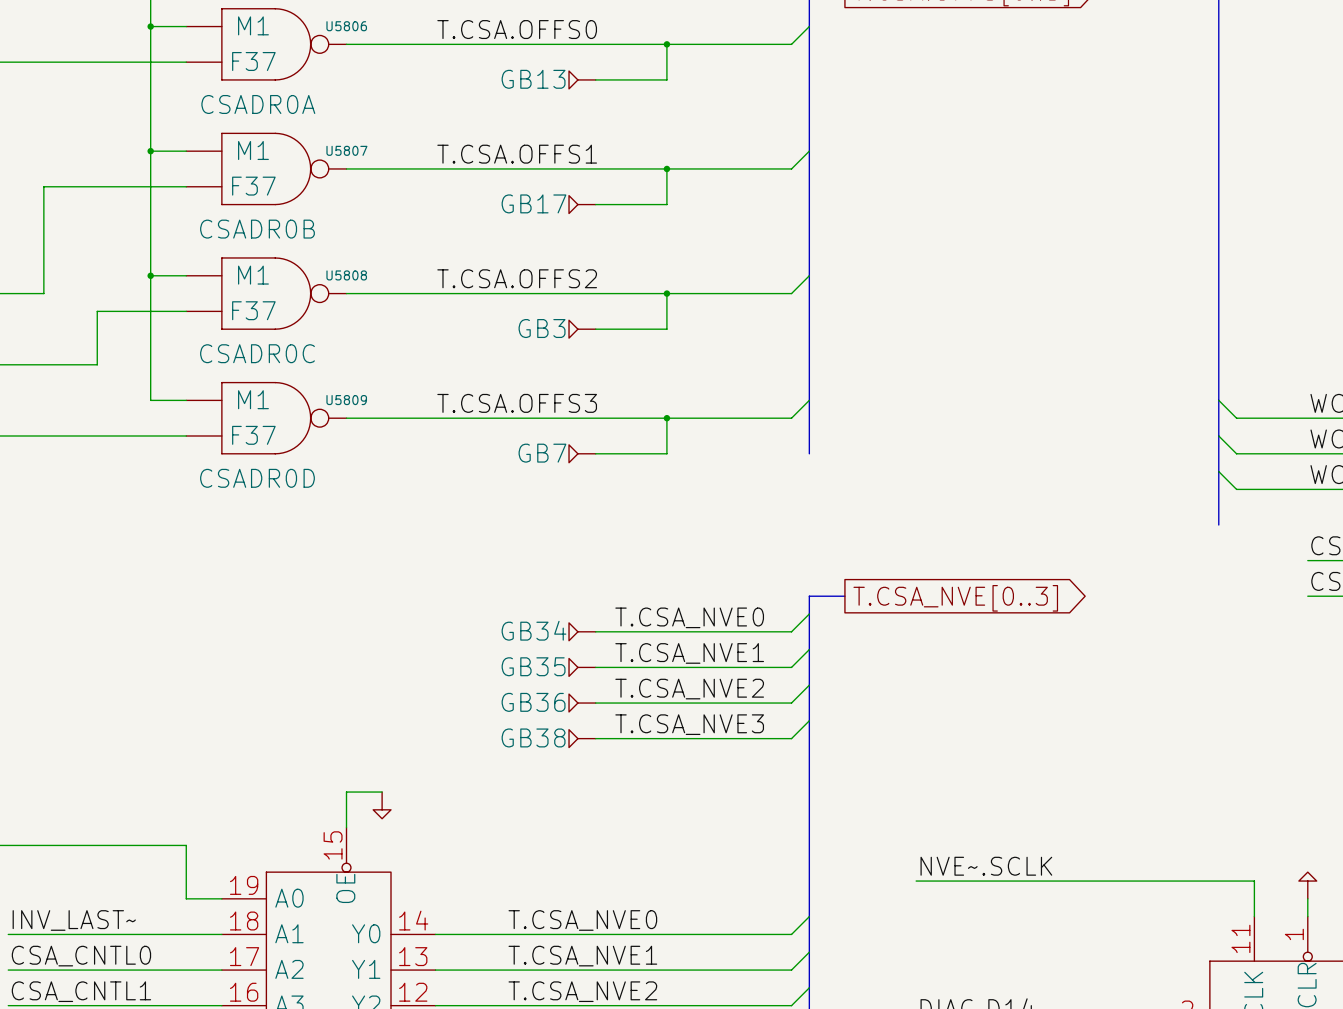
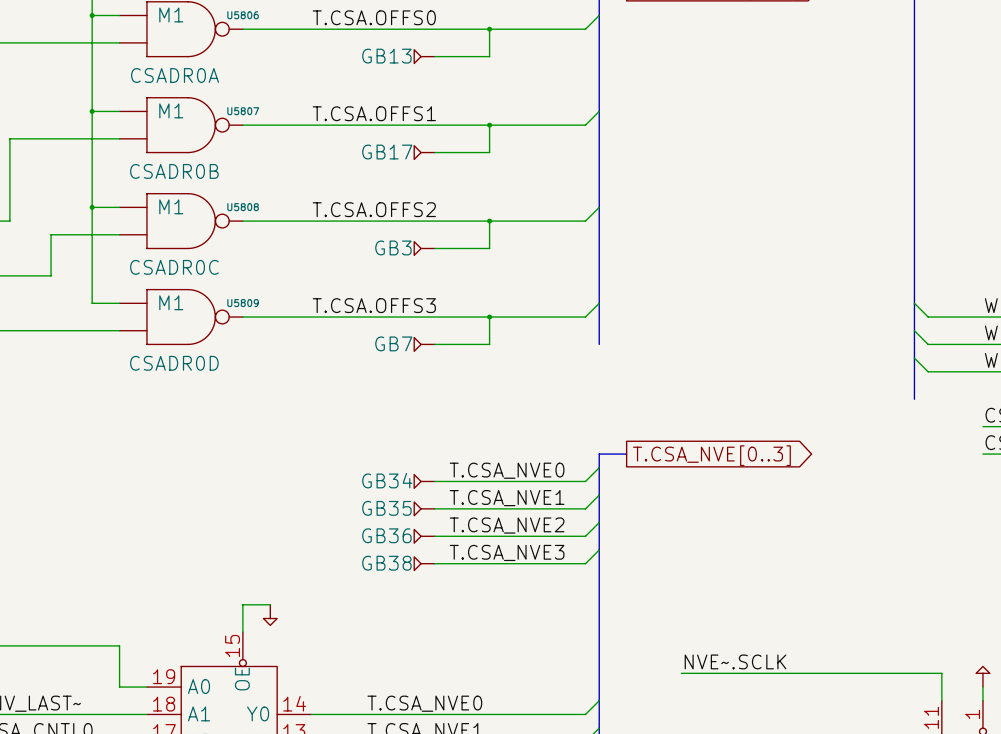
U5806 value: F37 (253, 61) -> none
U5807 value: F37 (253, 186) -> none
U5808 value: F37 (253, 310) -> none
U5809 value: F37 (253, 435) -> none

